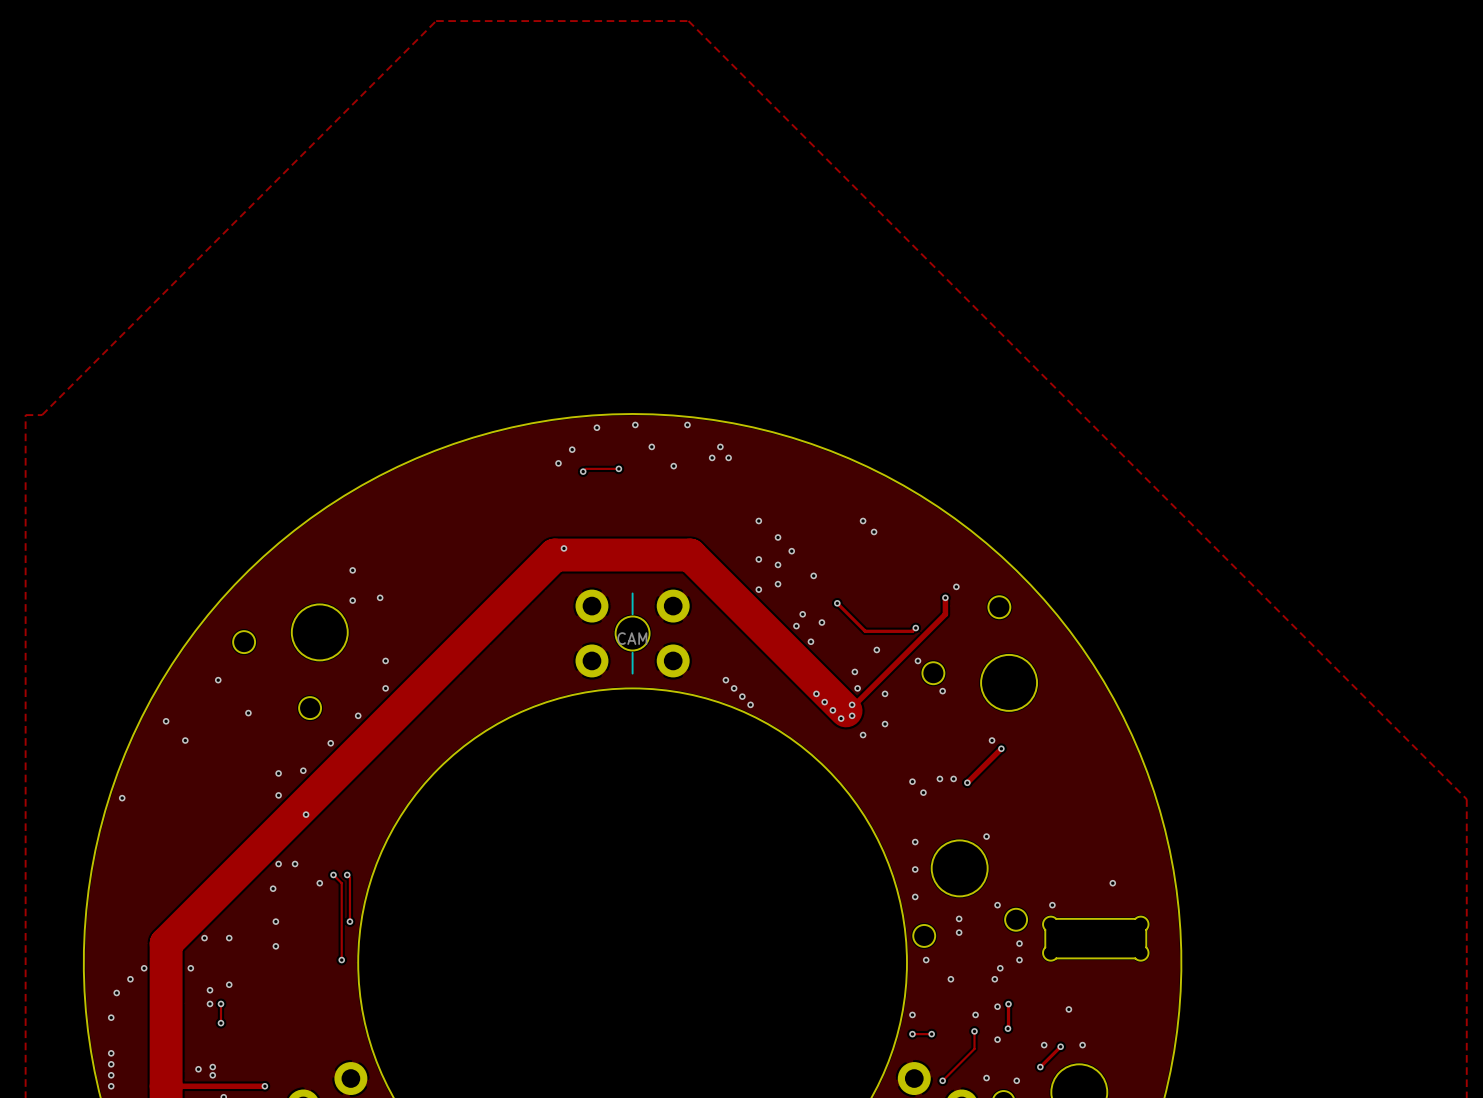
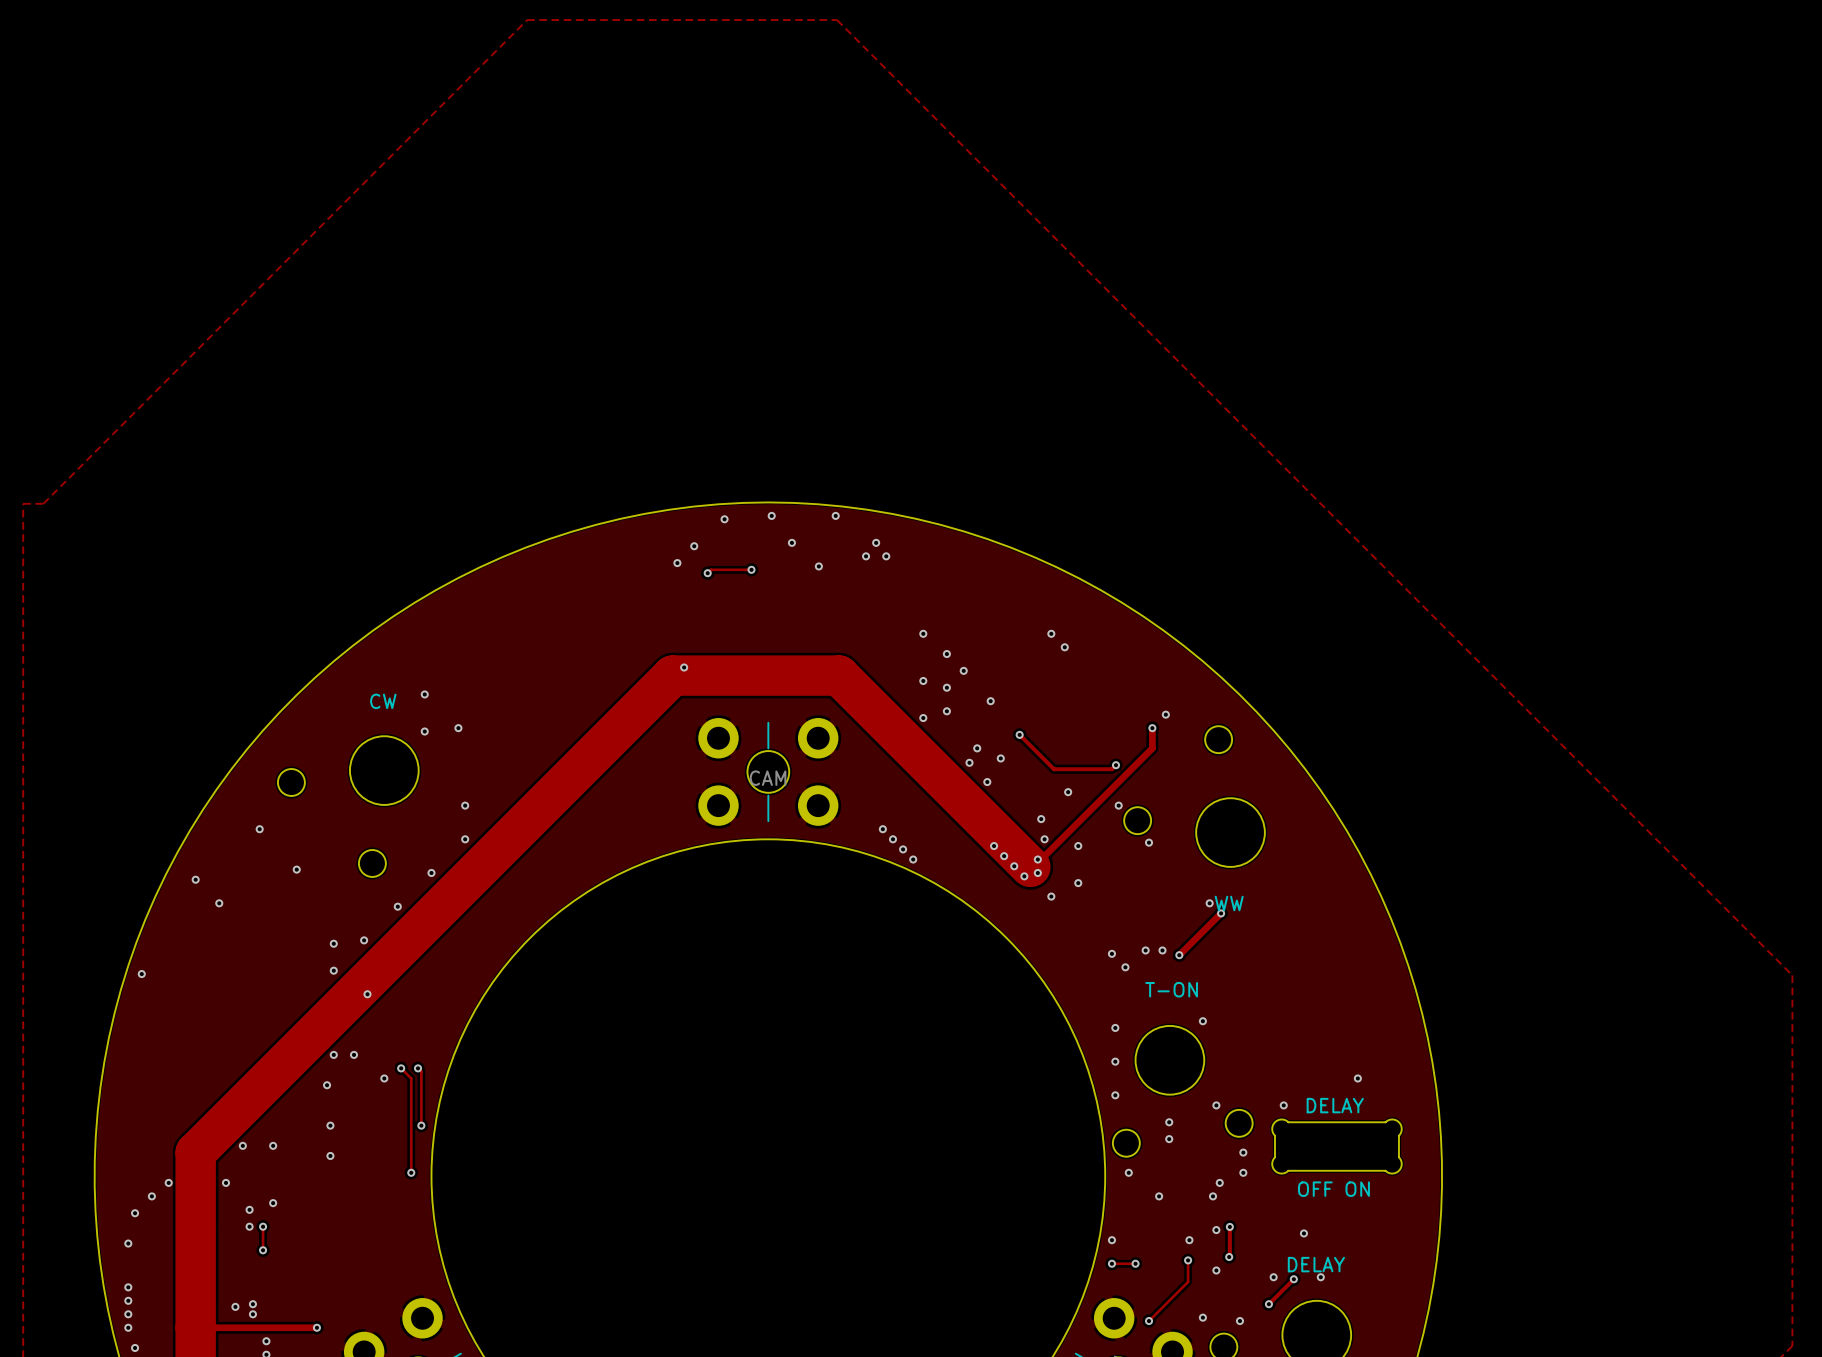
text: none -> CW (383, 701)
text: none -> WW (1229, 903)
text: none -> T-ON (1171, 989)
text: none -> DELAY (1335, 1105)
text: none -> OFF ON (1333, 1189)
text: none -> DELAY (1316, 1264)

